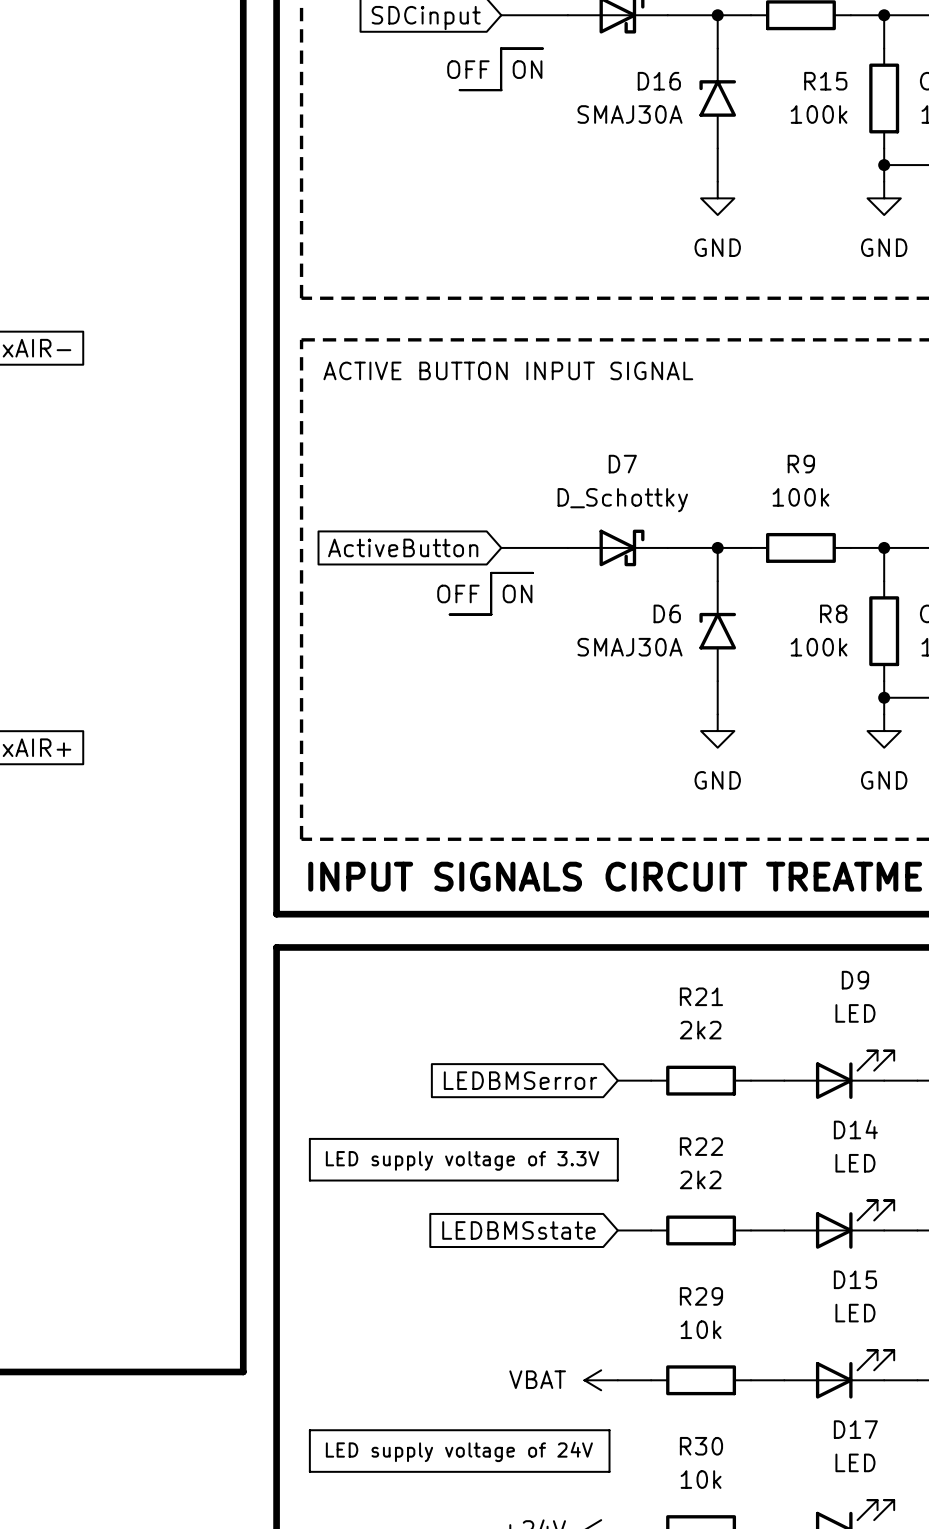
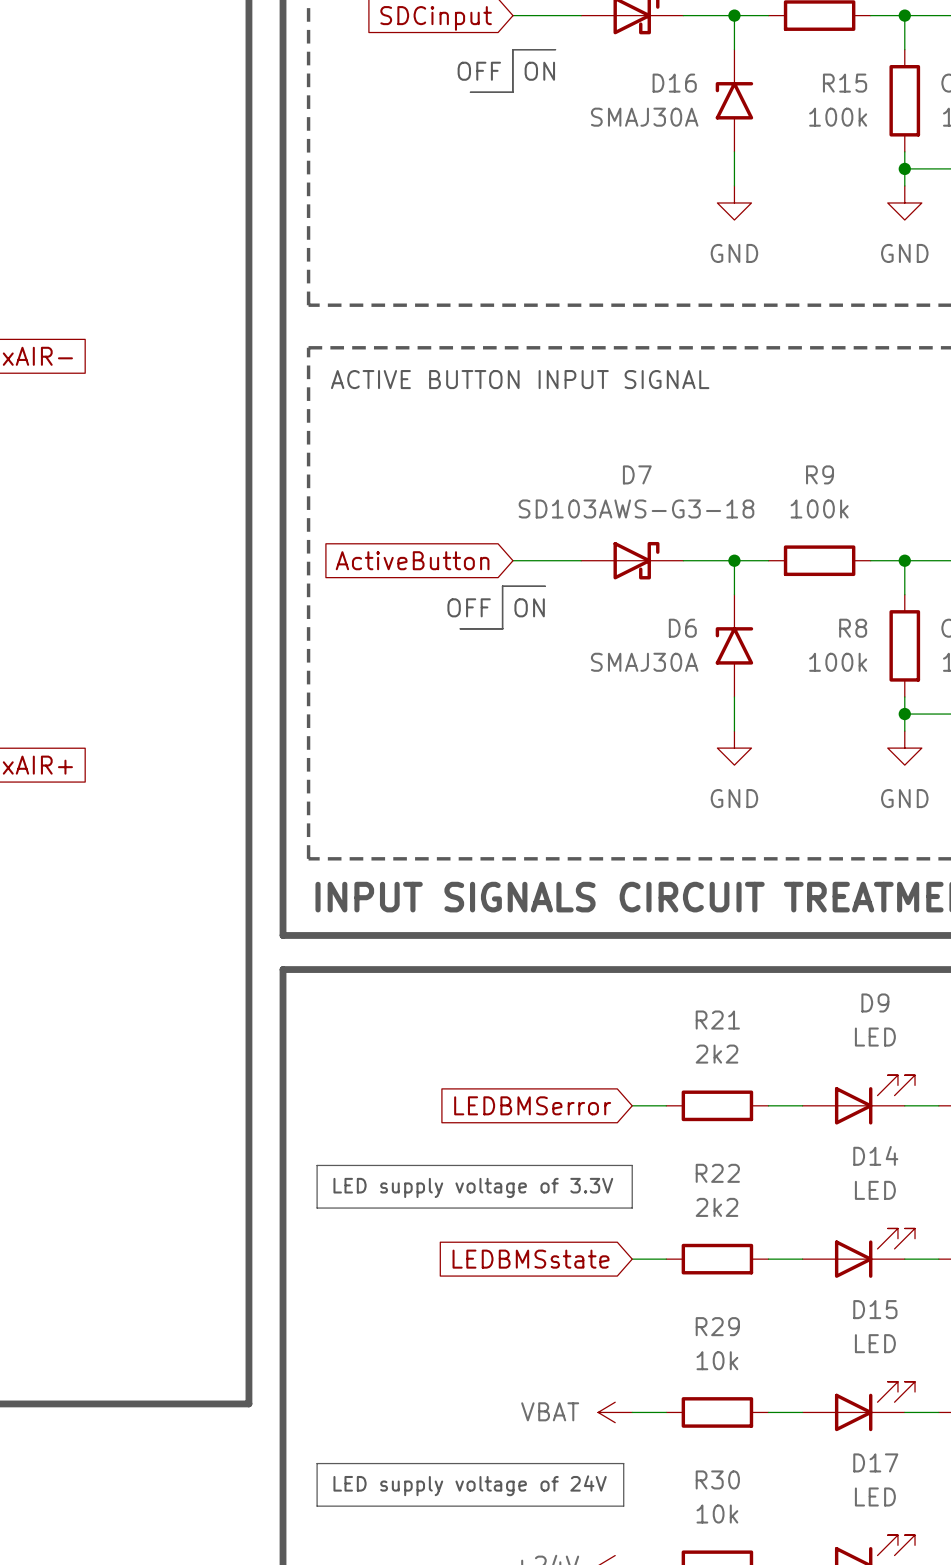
D7 value: D_Schottky (622, 500) -> SD103AWS-G3-18 (636, 508)

